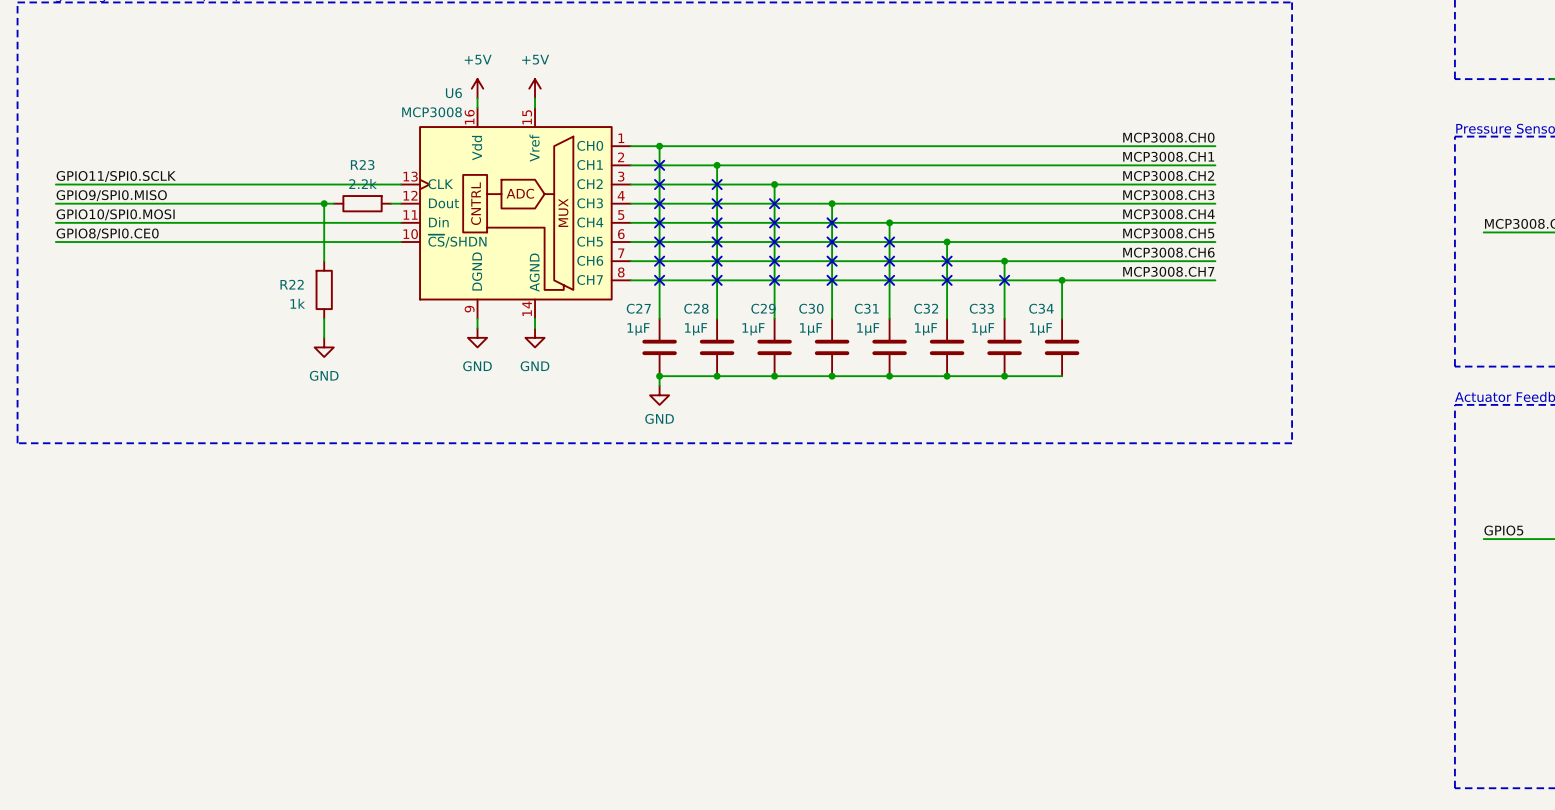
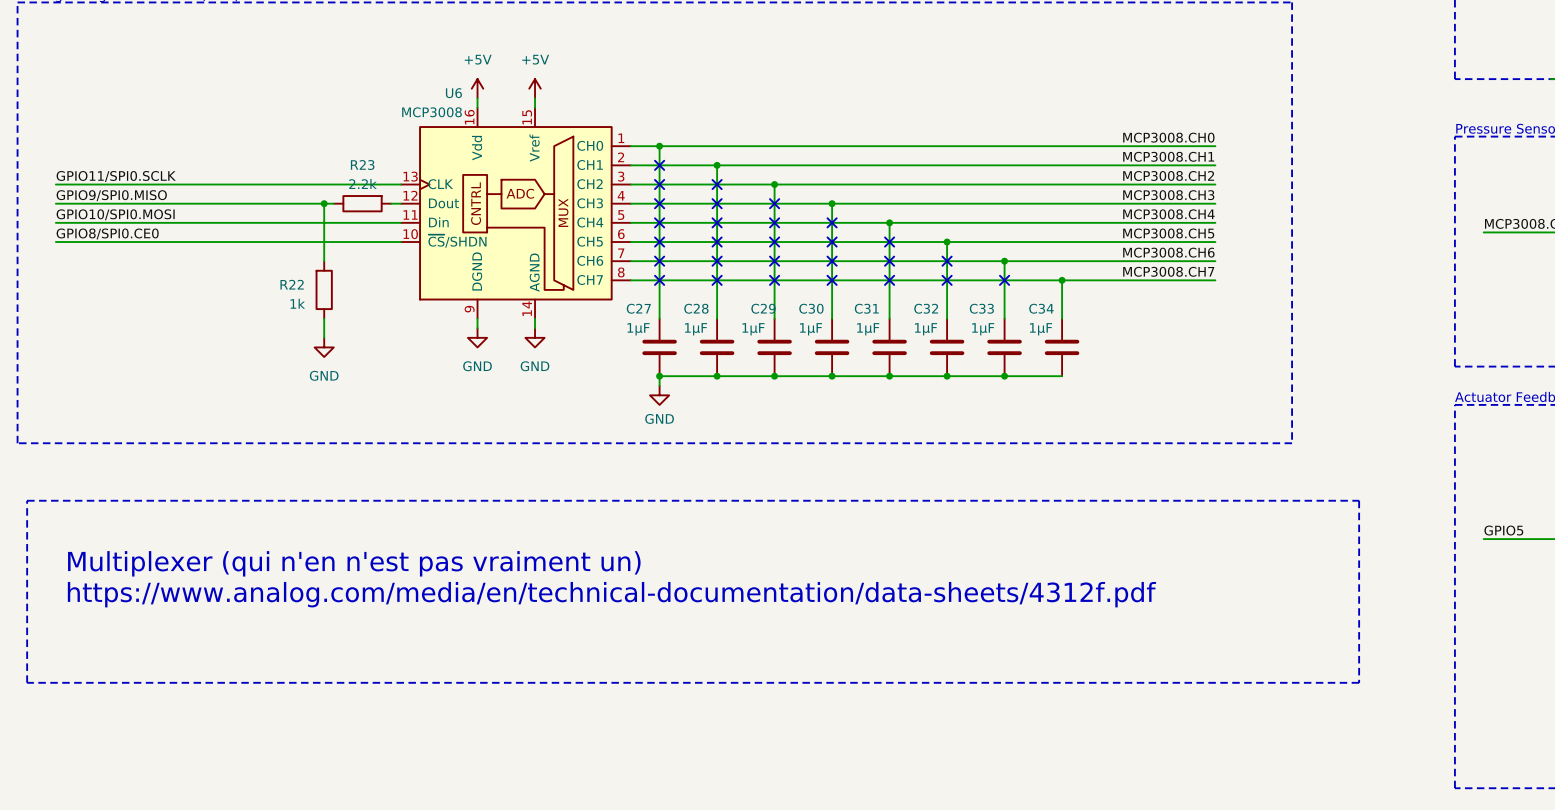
line: none -> (27, 500) (1359, 500) (1359, 682) (27, 682) (27, 500)
text: none -> Multiplexer (qui n'en n'est pas vraiment un) (354, 563)
text: none -> https://www.analog.com/media/en/technical-documentation/data-sheets/4312f.pdf (611, 594)

